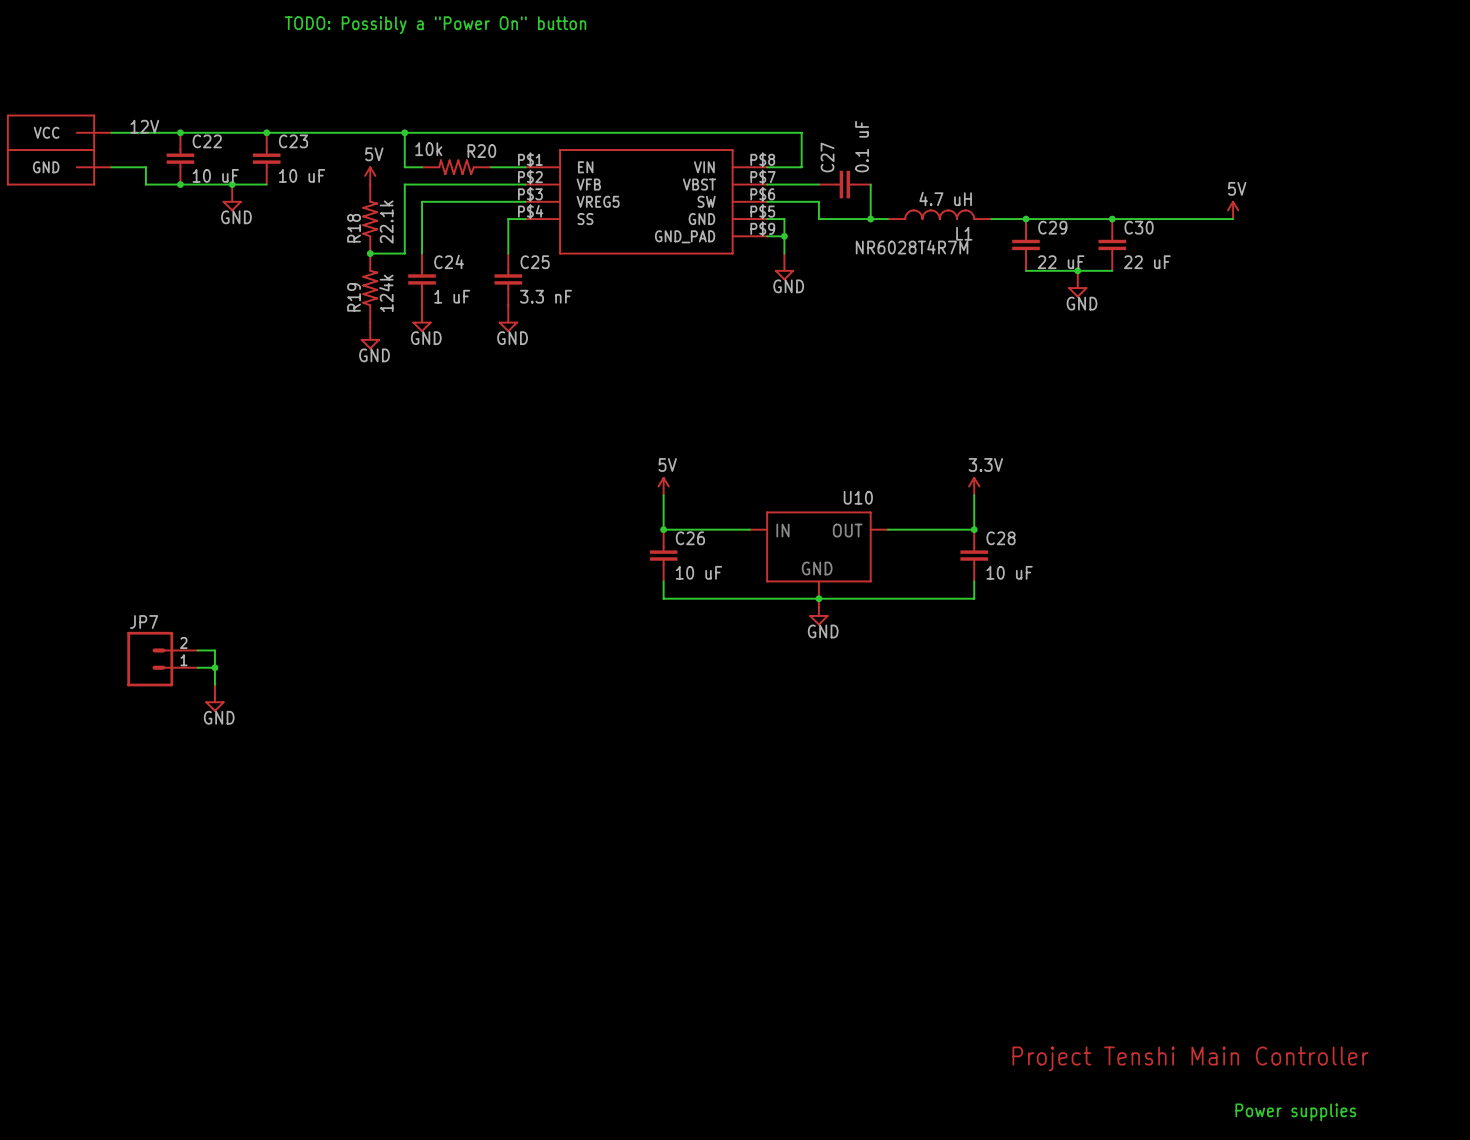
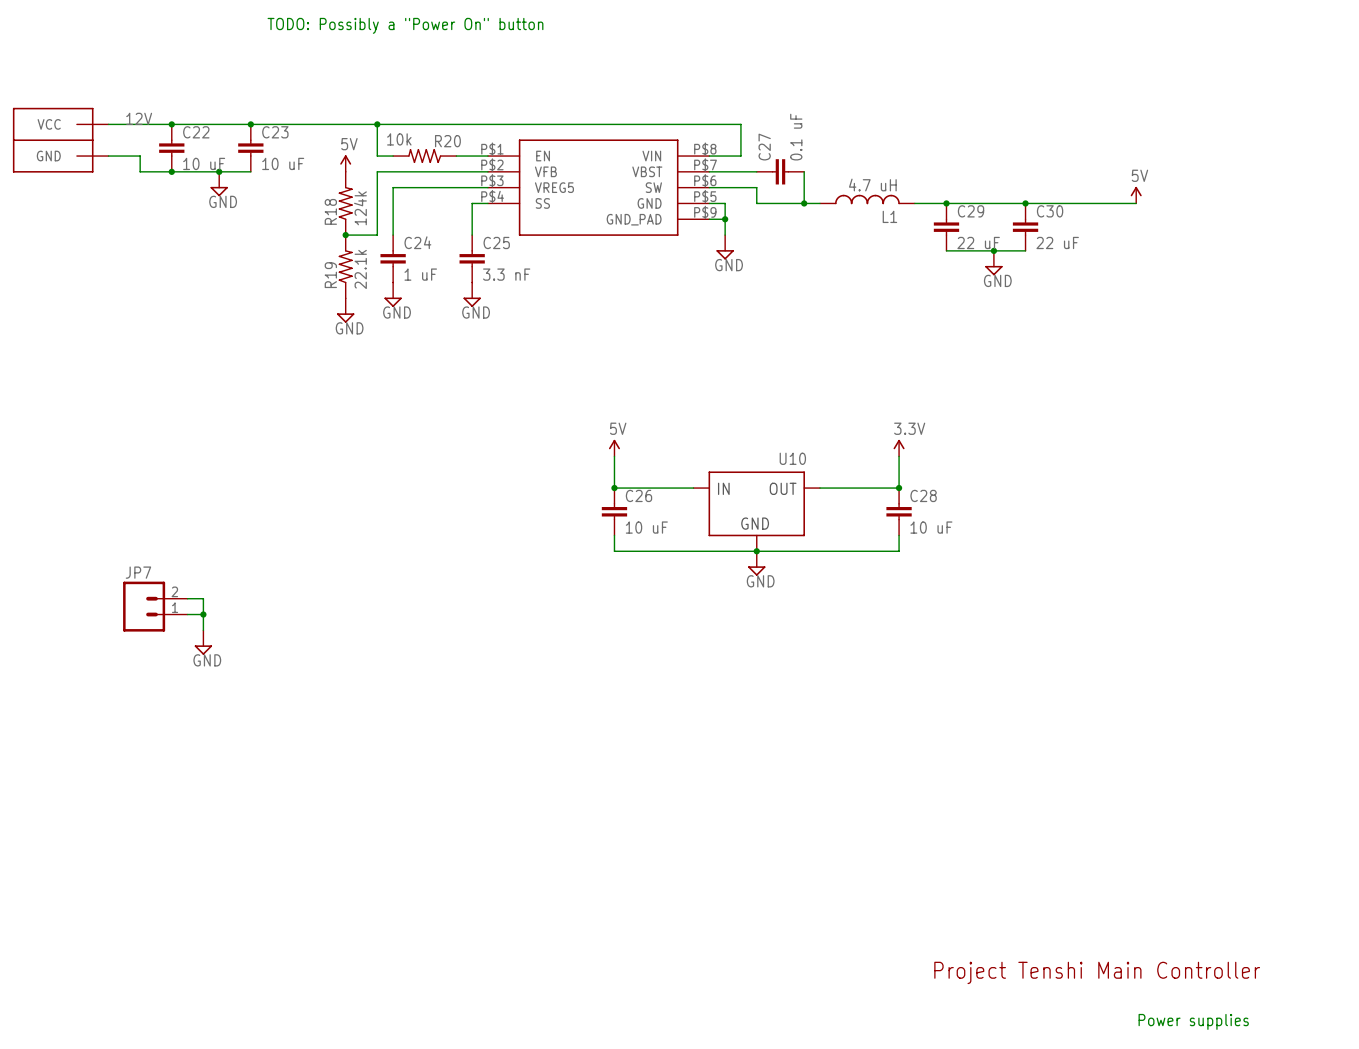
R18 value: 22.1k (386, 222) -> 124k (360, 208)
L1 text: NR6028T4R7M (912, 247) -> none
R19 value: 124k (386, 293) -> 22.1k (360, 269)

